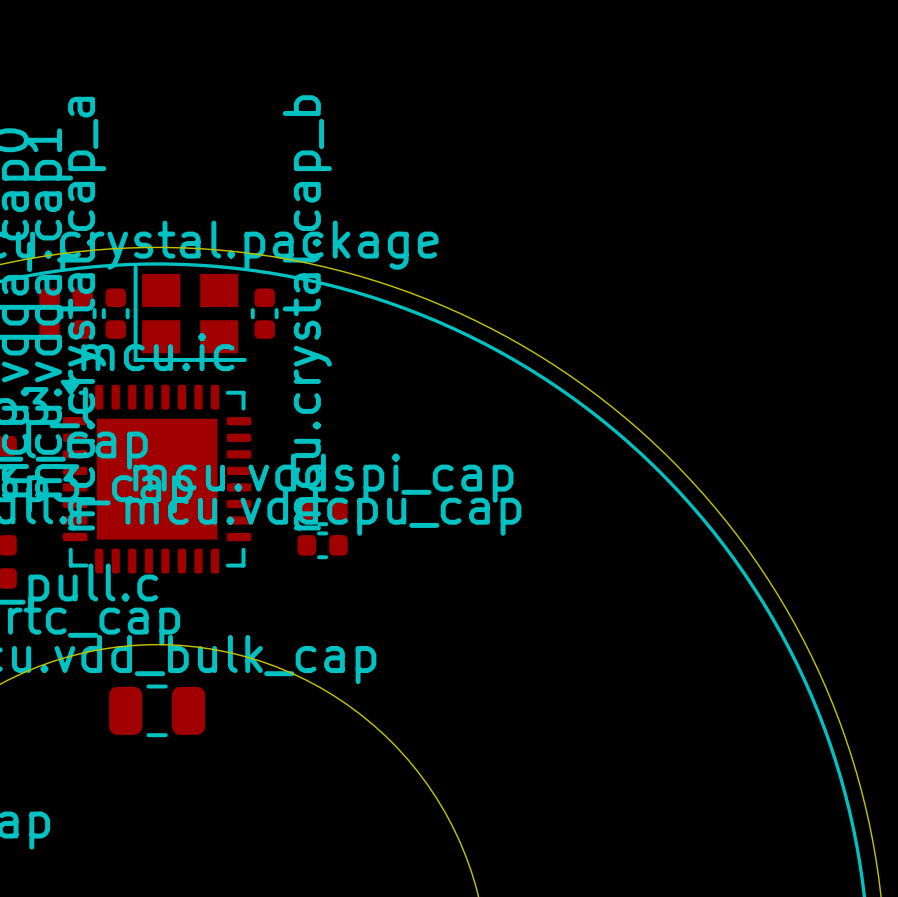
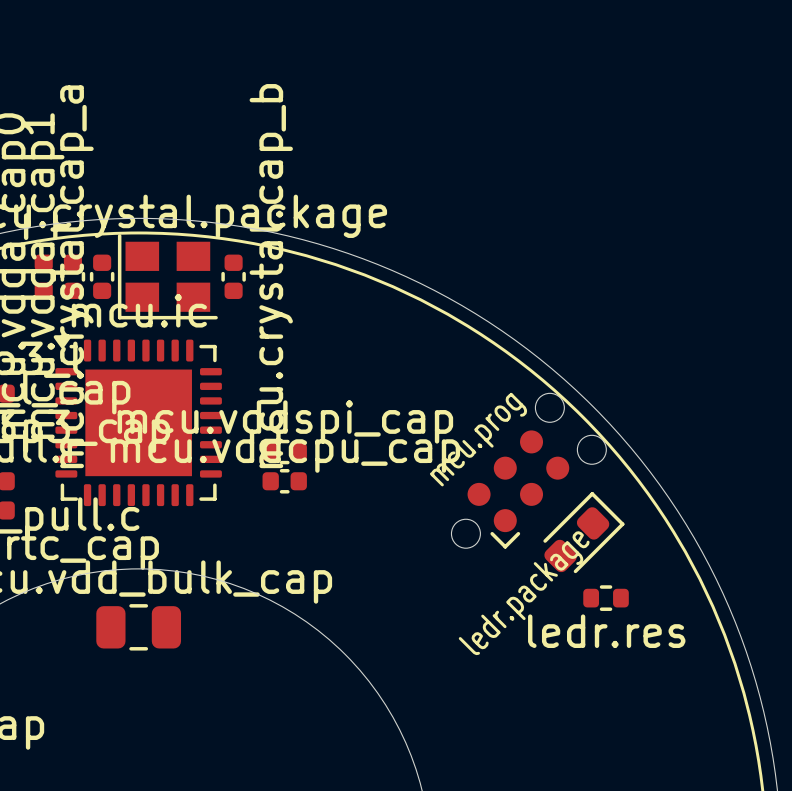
mcu.prog: none -> (528, 470)
ledr.package: none -> (583, 532)
ledr.res: none -> (606, 598)

